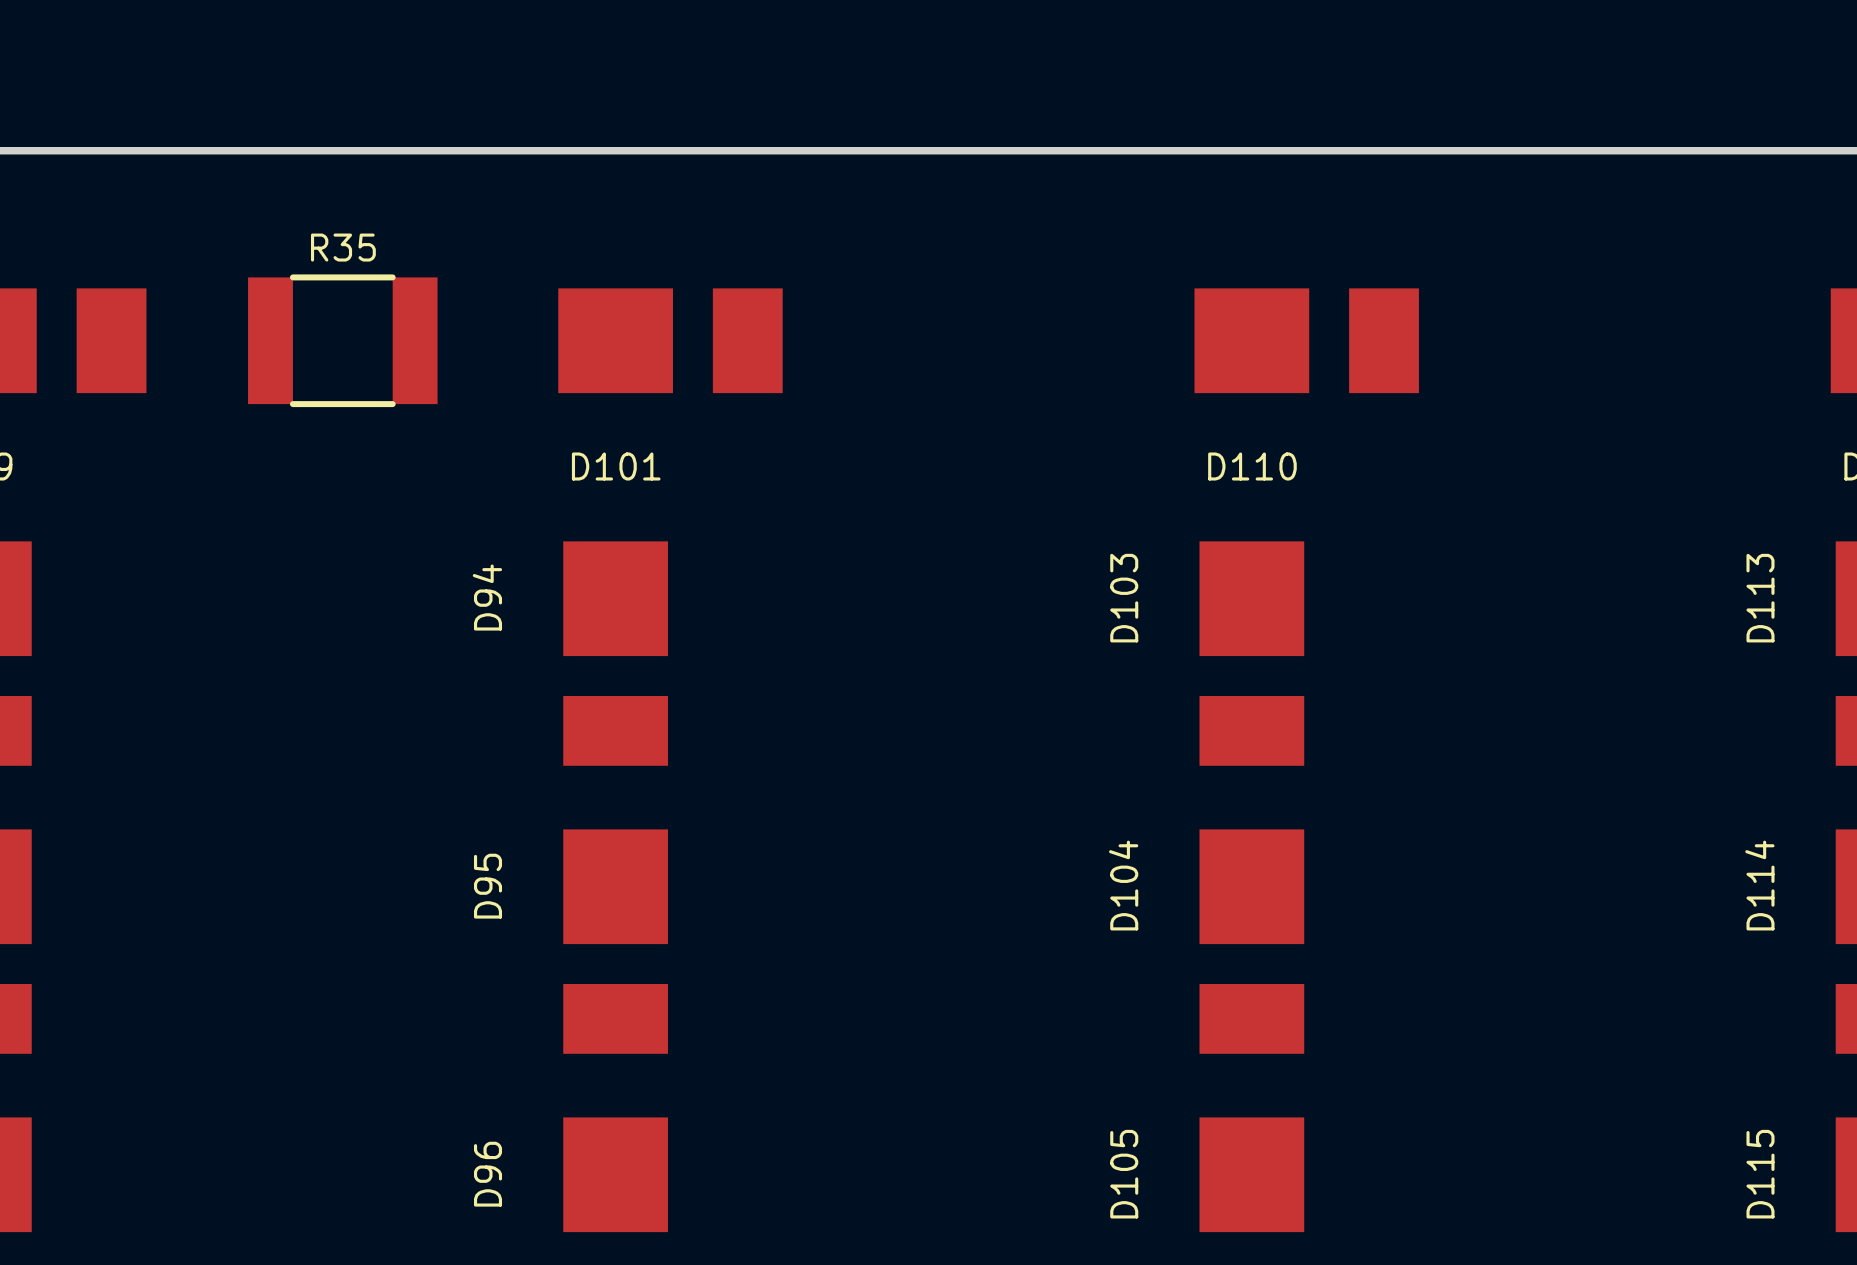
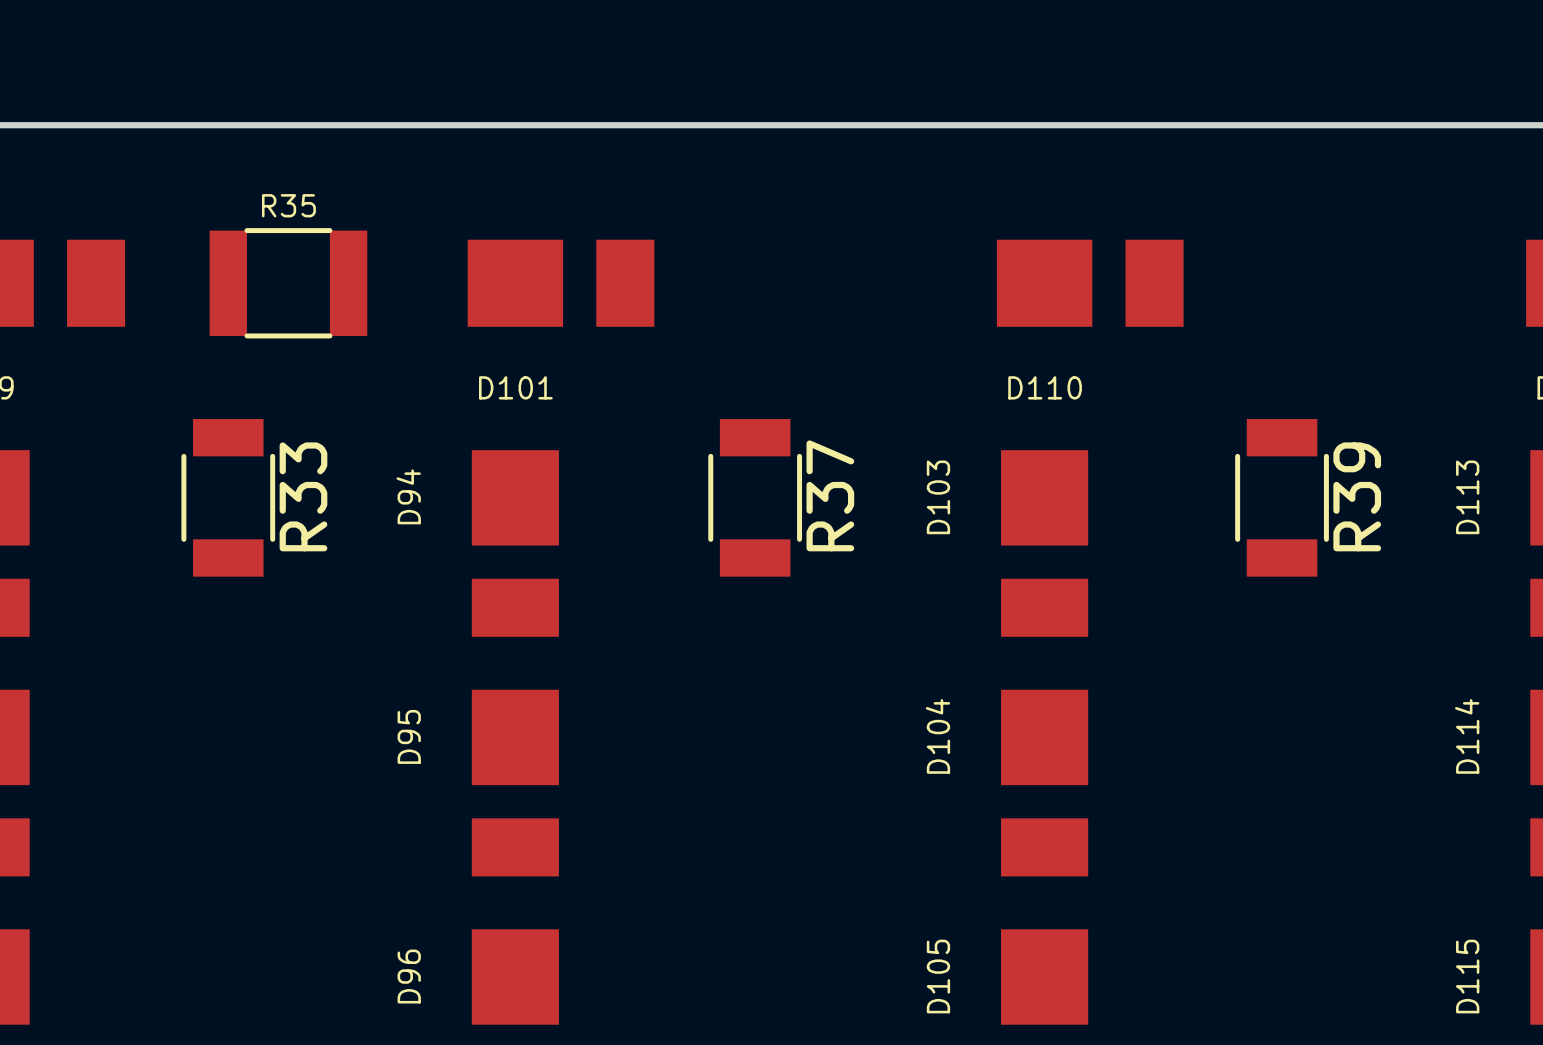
R33: none -> (228, 497)
R37: none -> (755, 497)
R39: none -> (1282, 497)

